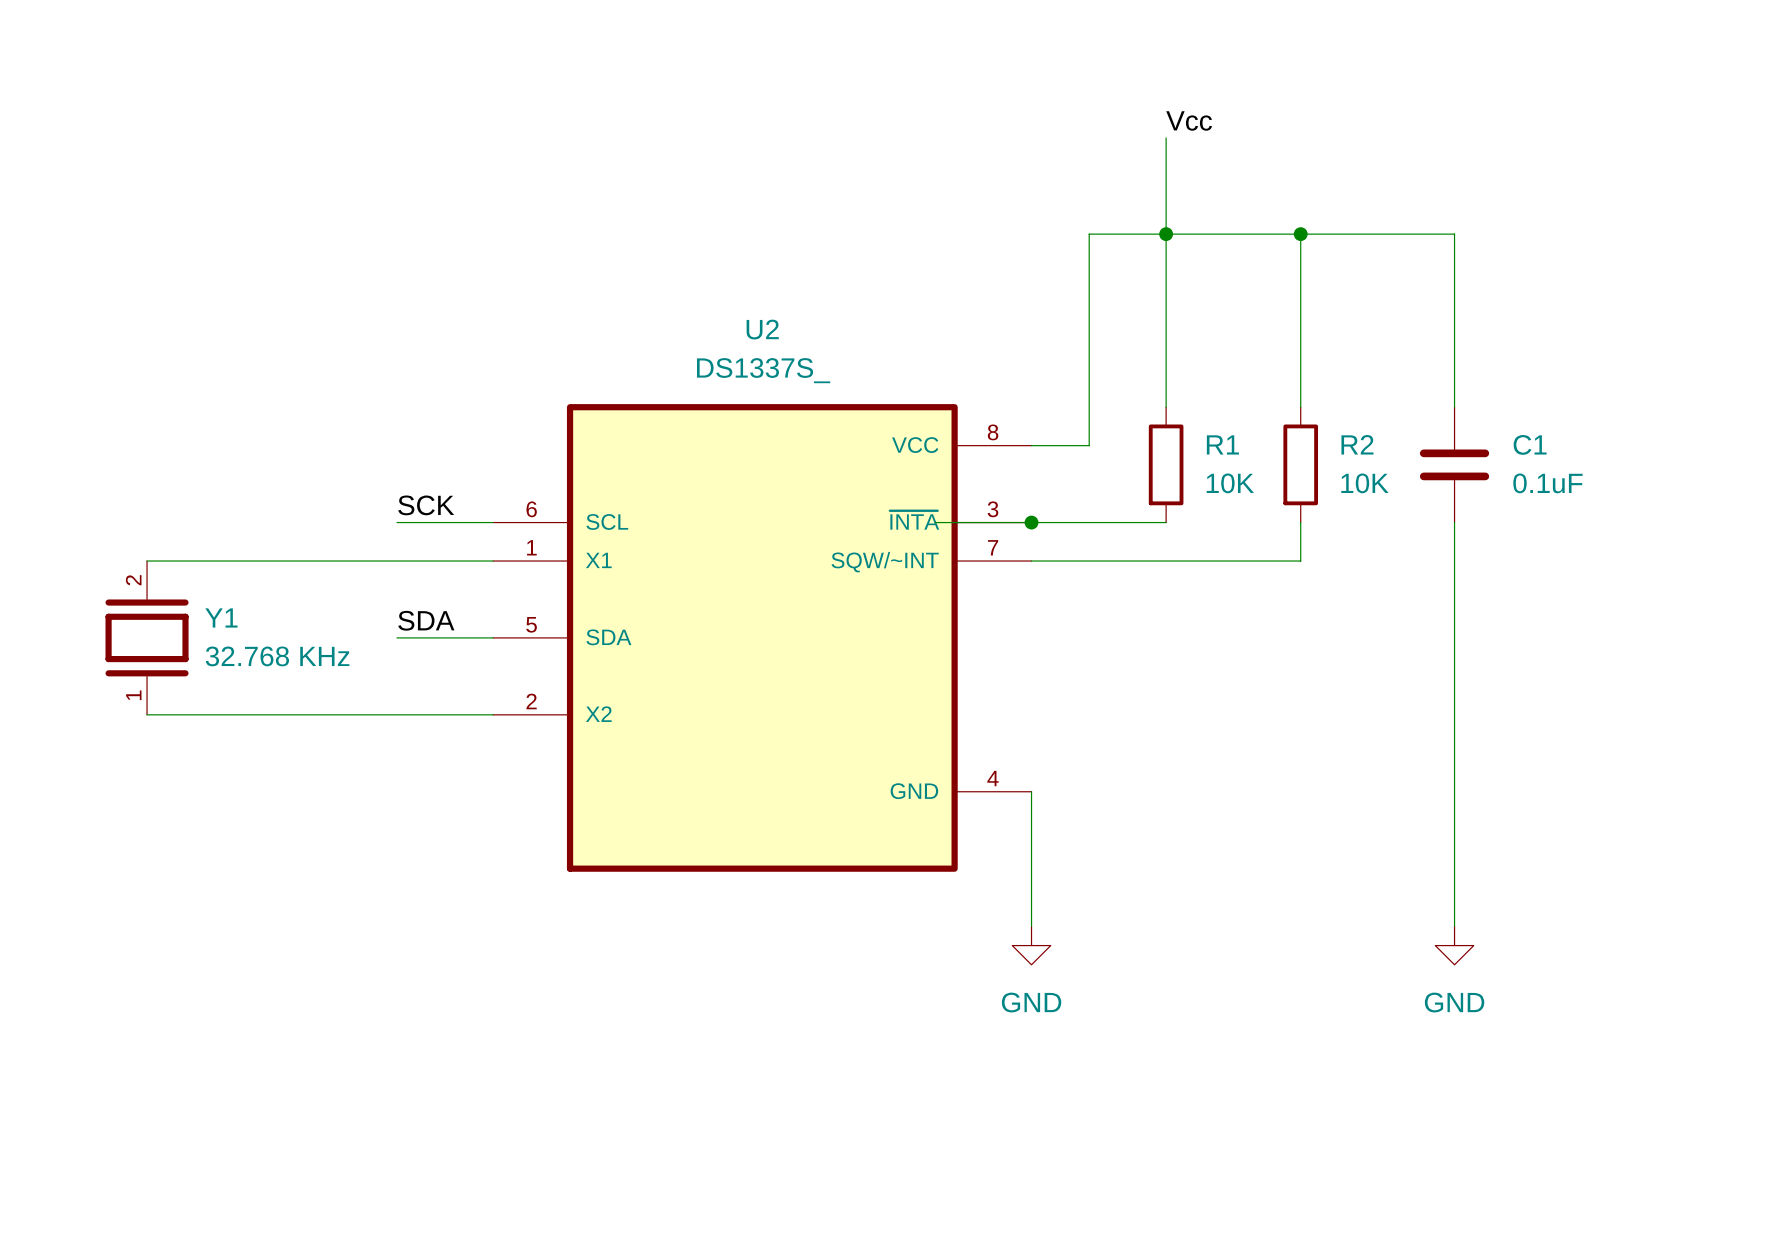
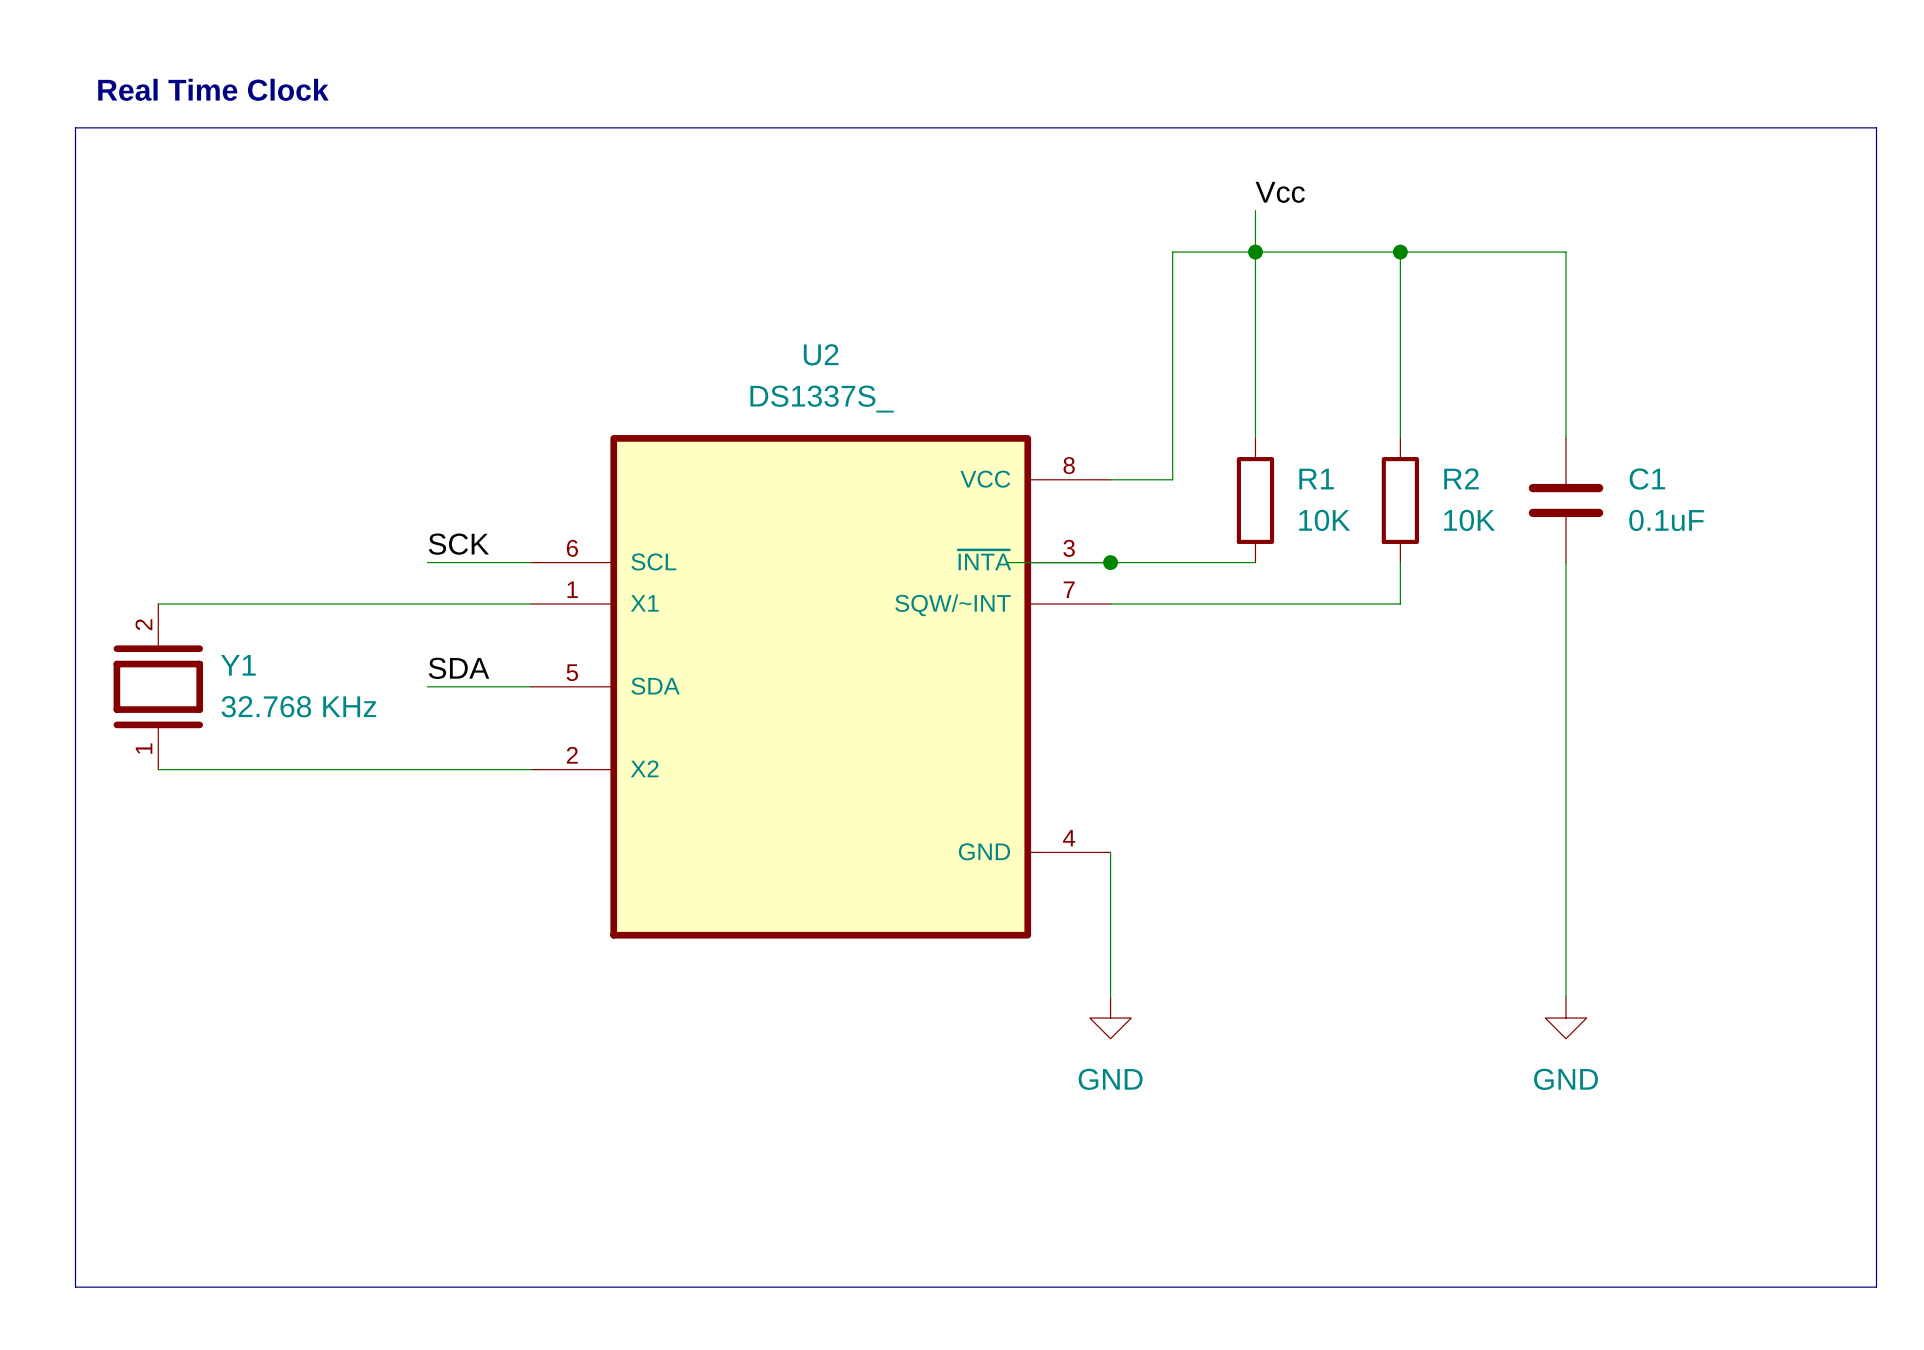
text: none -> Real Time Clock (213, 89)
line: none -> (75, 127) (1876, 127) (1876, 1287) (75, 1287) (75, 127)
label position: Vcc (1189, 120) -> Vcc (1280, 192)
wire: (1166, 138) (1166, 195) -> none

